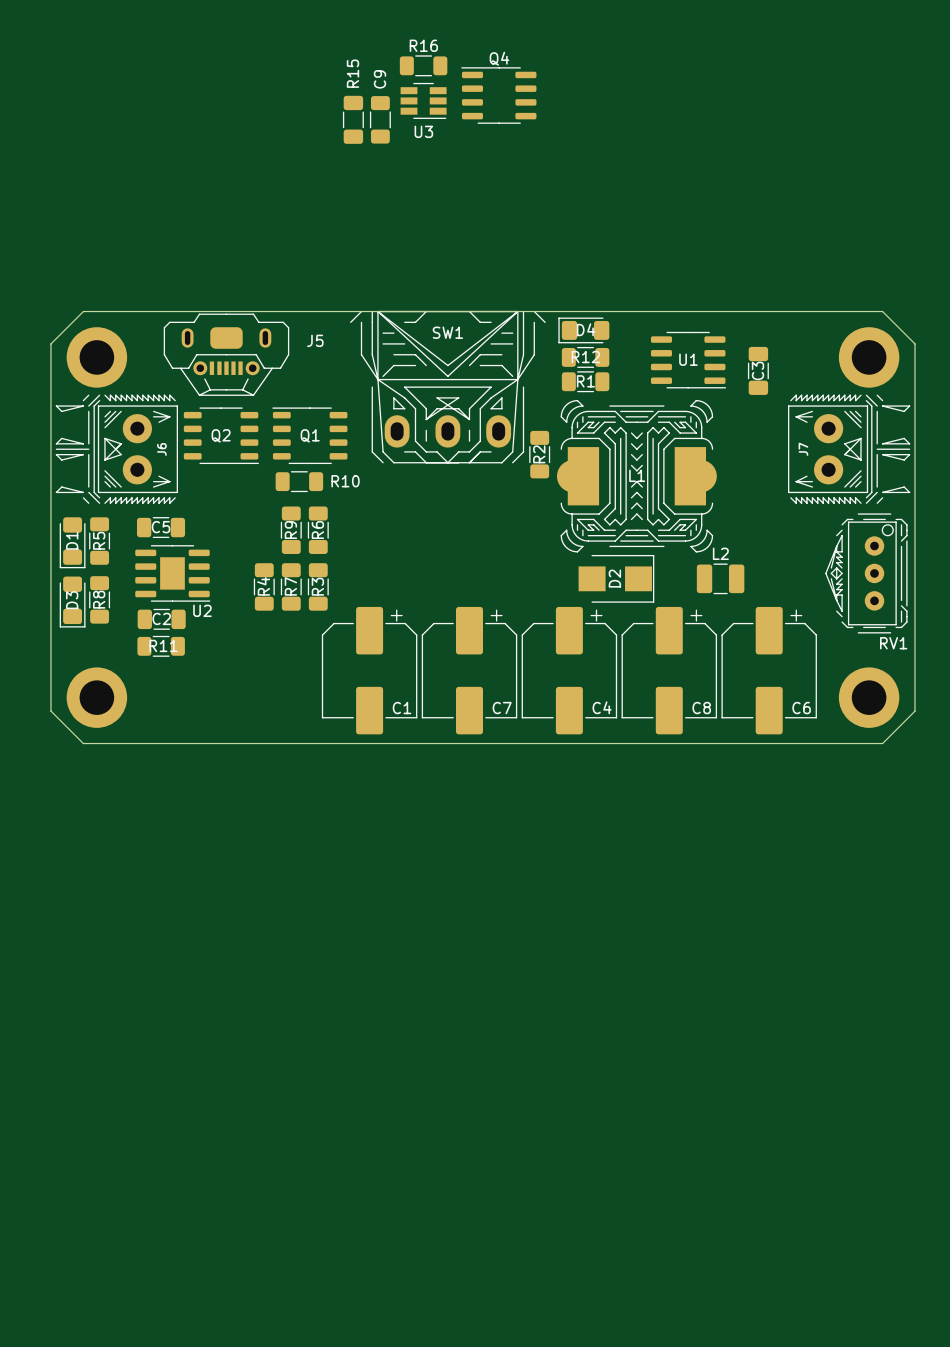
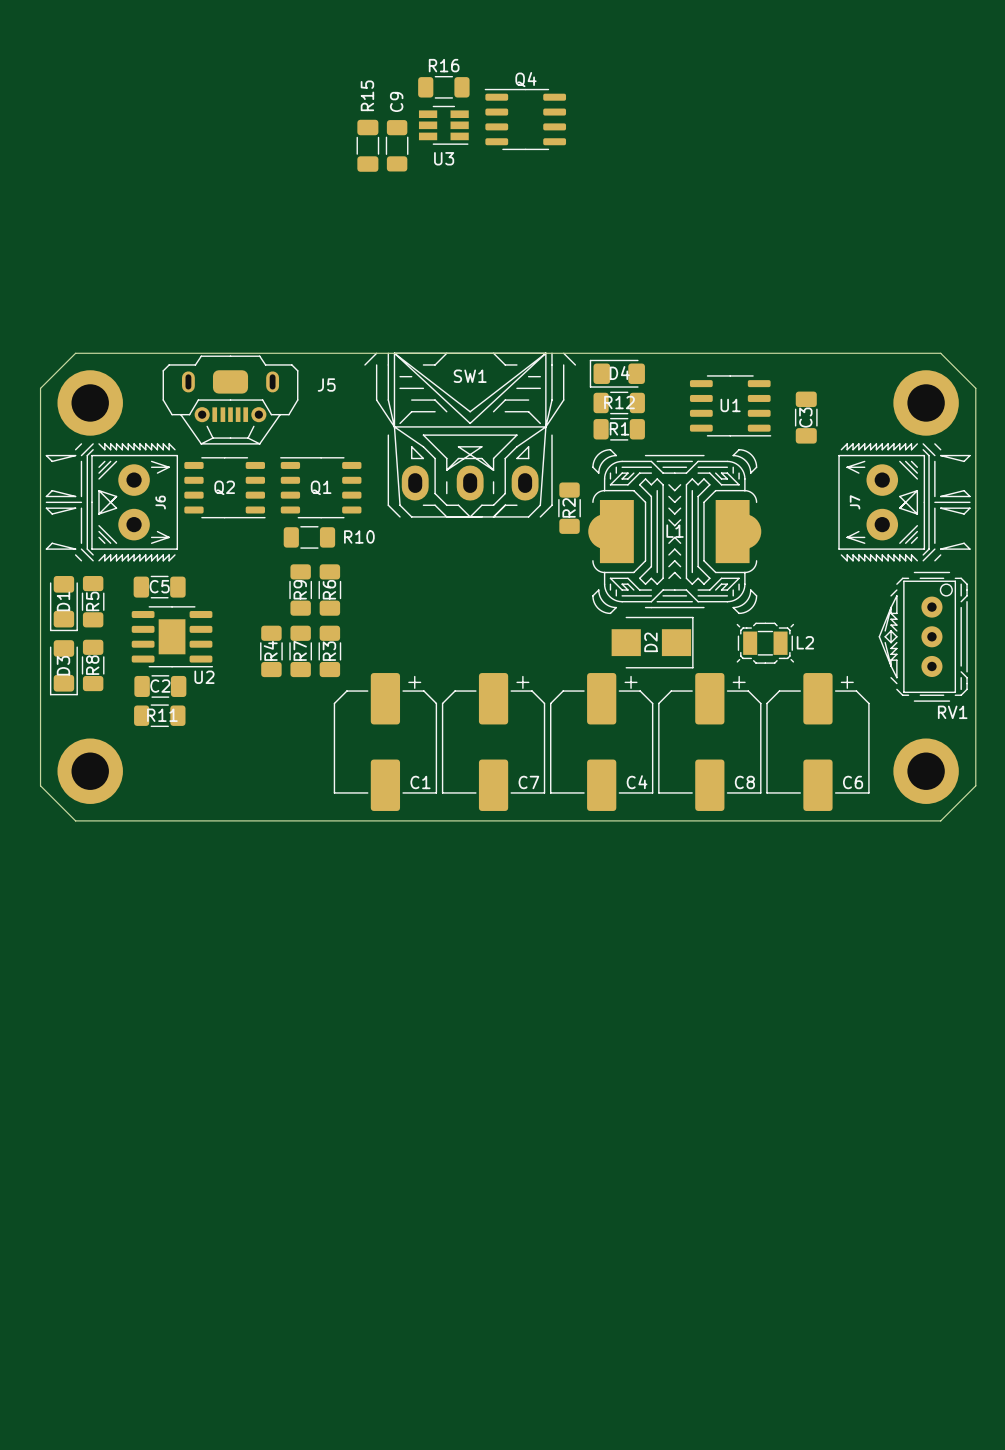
L2 name position: L2 (720, 553) -> L2 (805, 642)
L2 footprint: [696, 563, 745, 595] -> [736, 622, 795, 664]

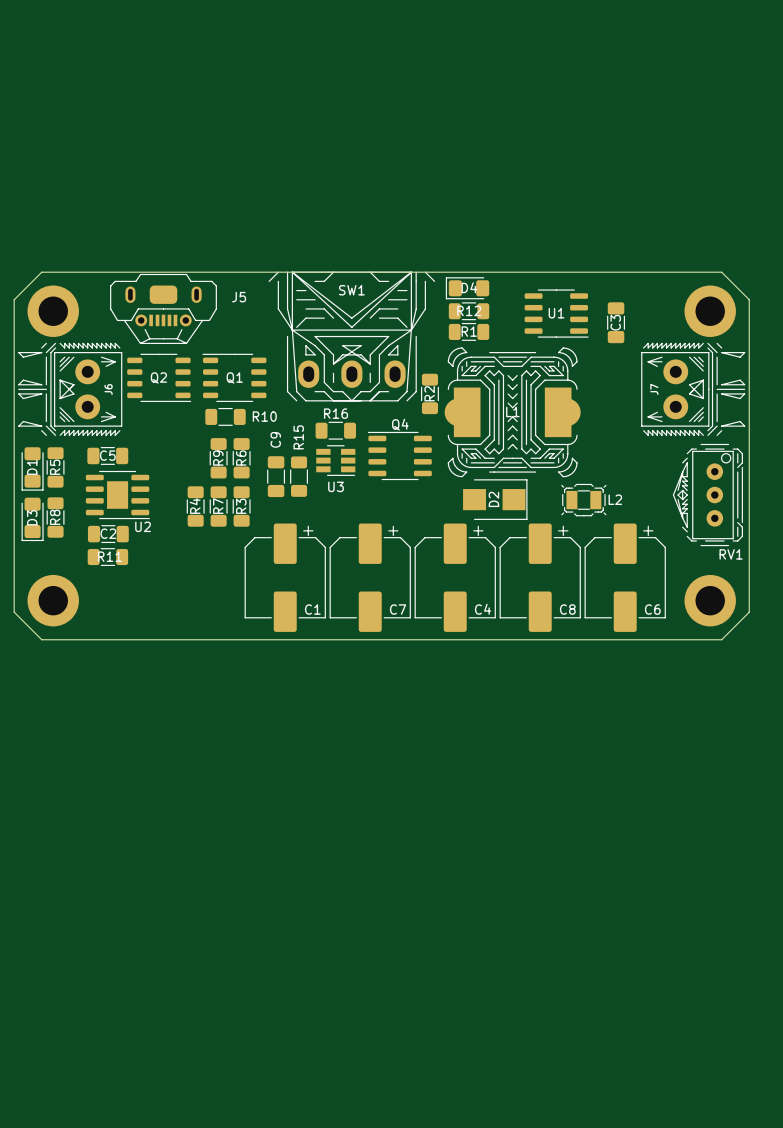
R16 position: (443, 87) -> (335, 430)
R15 name position: R15 (367, 95) -> R15 (298, 437)
C9 name position: C9 (396, 101) -> C9 (275, 439)
Q4 position: (525, 119) -> (399, 455)
U3 position: (443, 125) -> (335, 460)
C9 position: (367, 145) -> (276, 476)
R15 position: (397, 145) -> (299, 476)

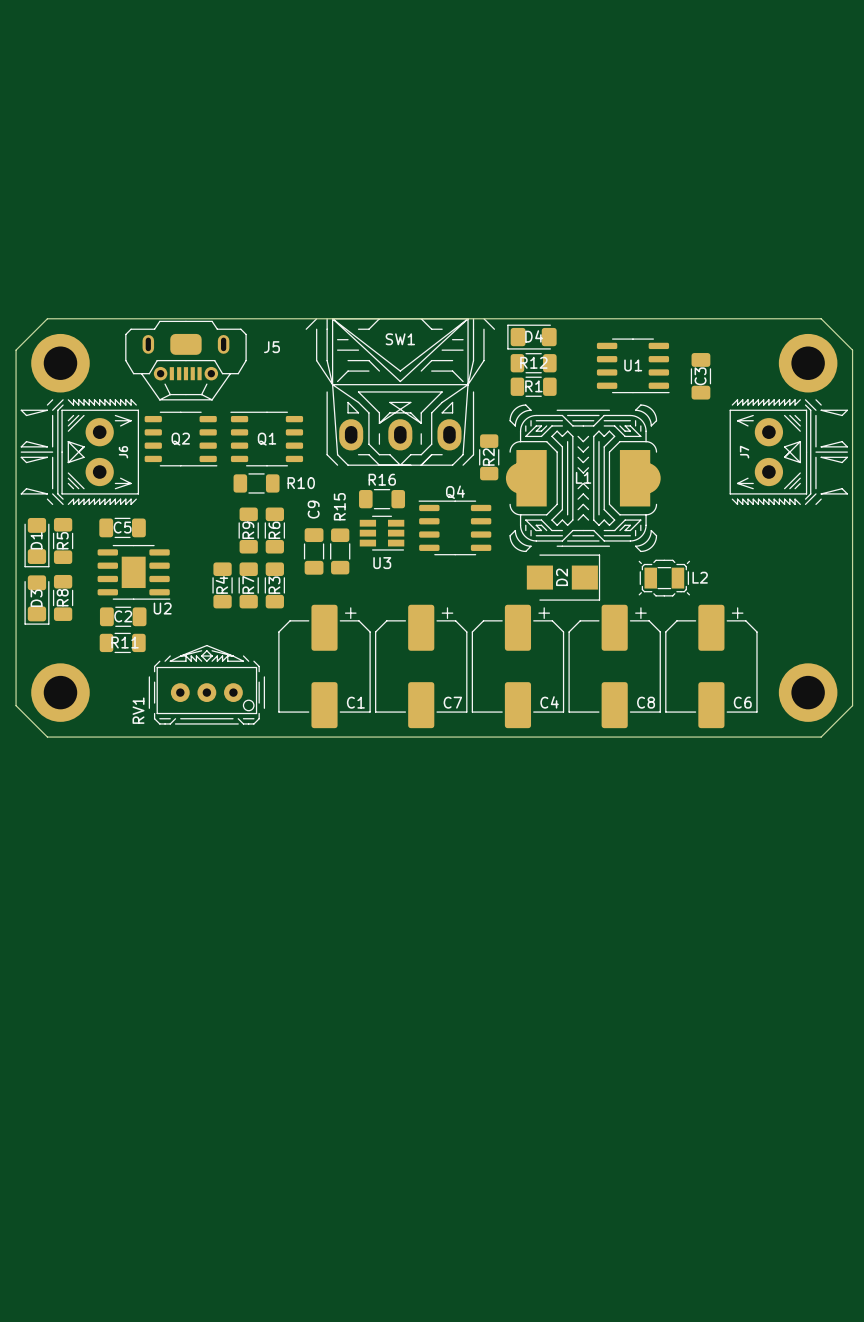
RV1 rotation: 0° (707, 495) -> 90° clockwise (206, 684)
RV1 position: (707, 495) -> (206, 684)

